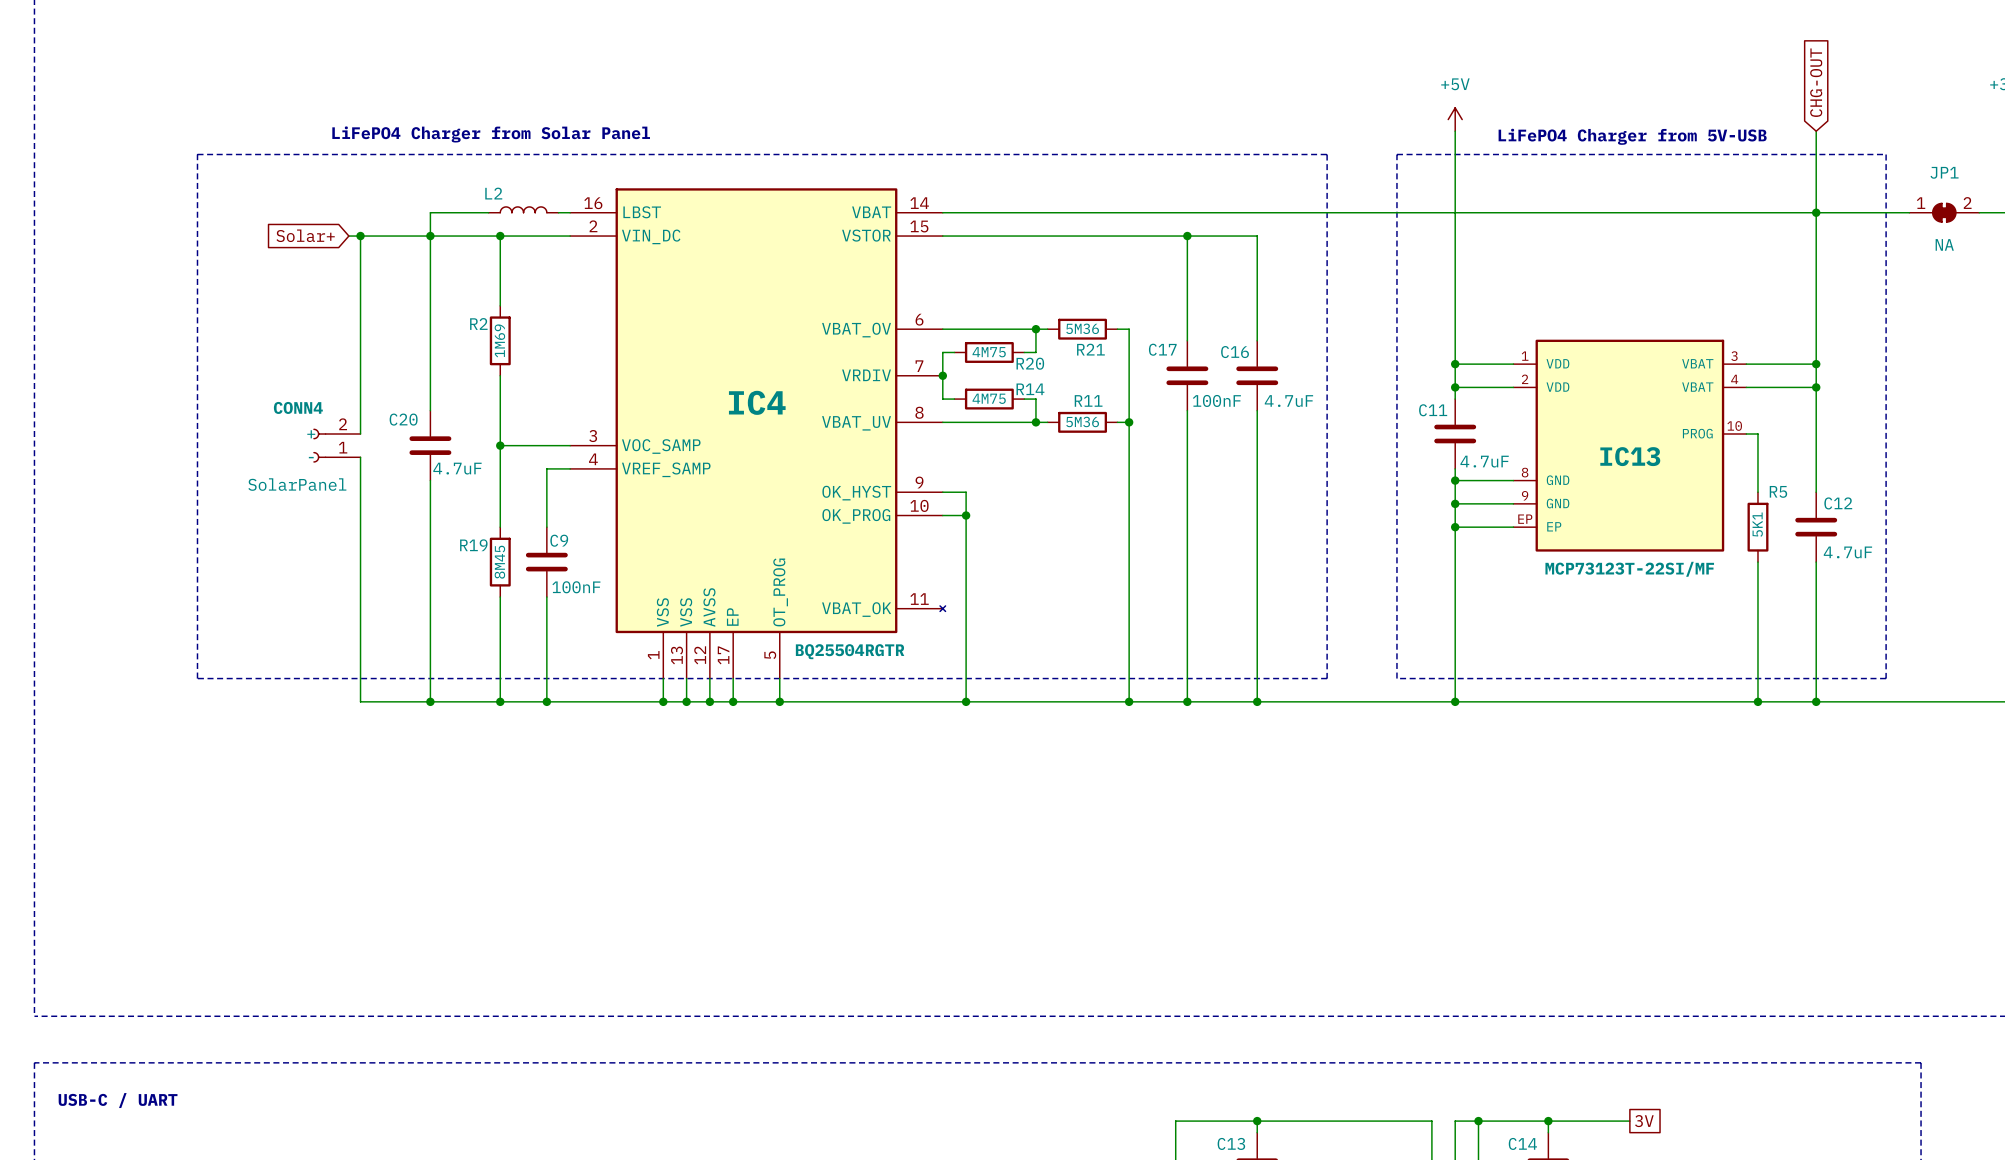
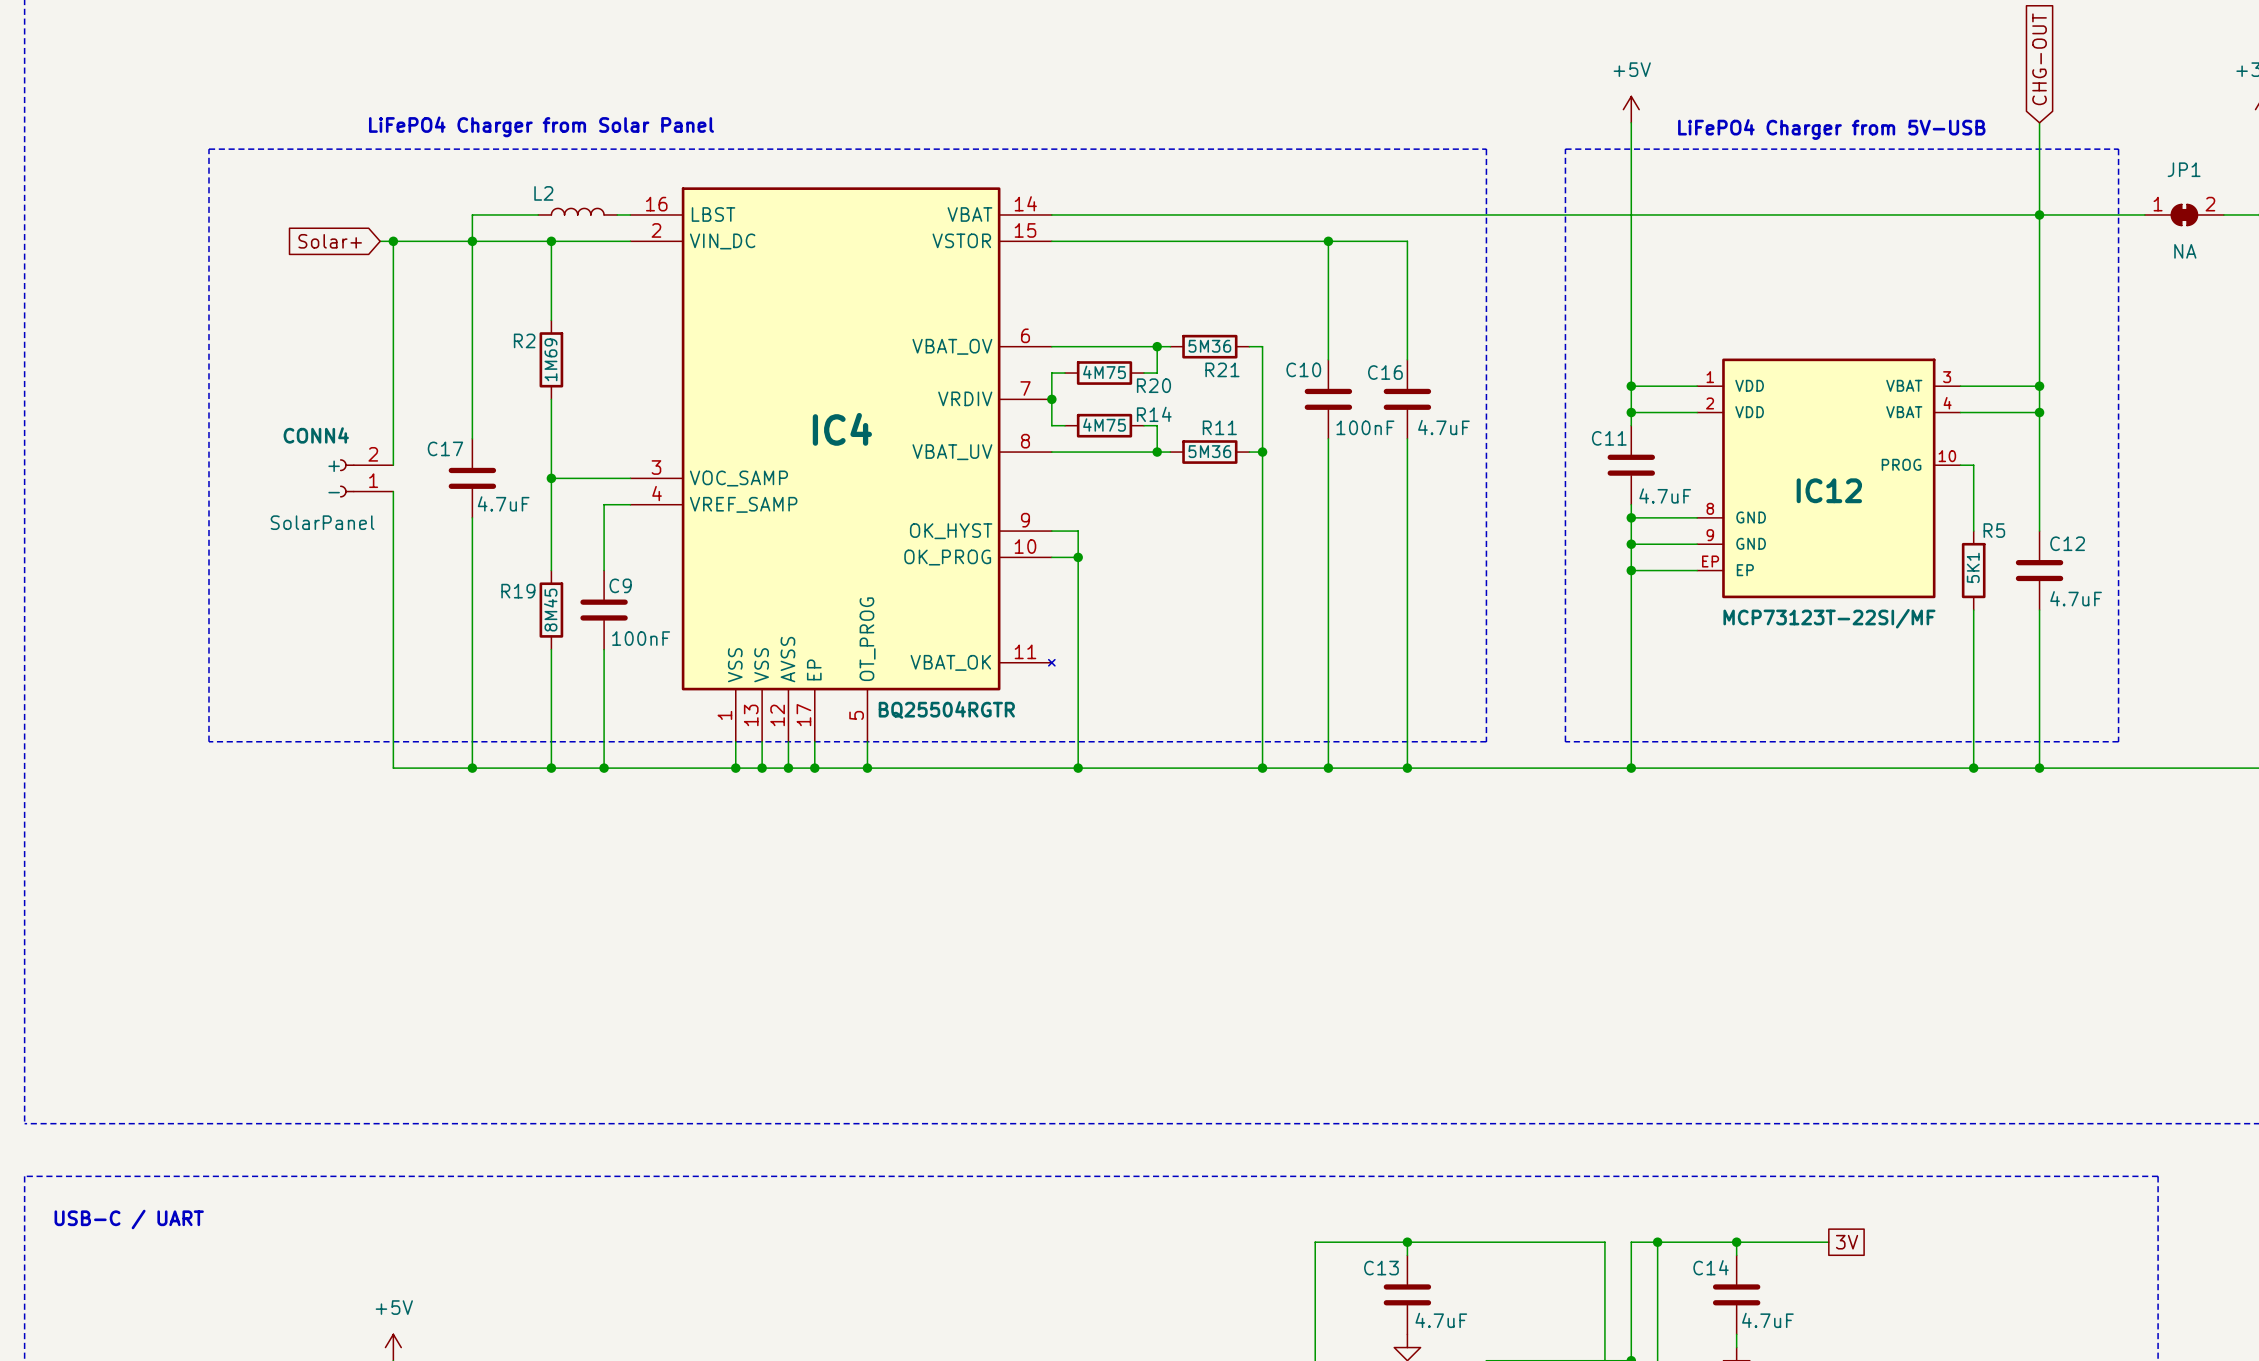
C17 name: C17 (1162, 349) -> C10 (1303, 369)
C20 name: C20 (403, 419) -> C17 (445, 448)
IC13 name: IC13 (1630, 456) -> IC12 (1829, 490)

